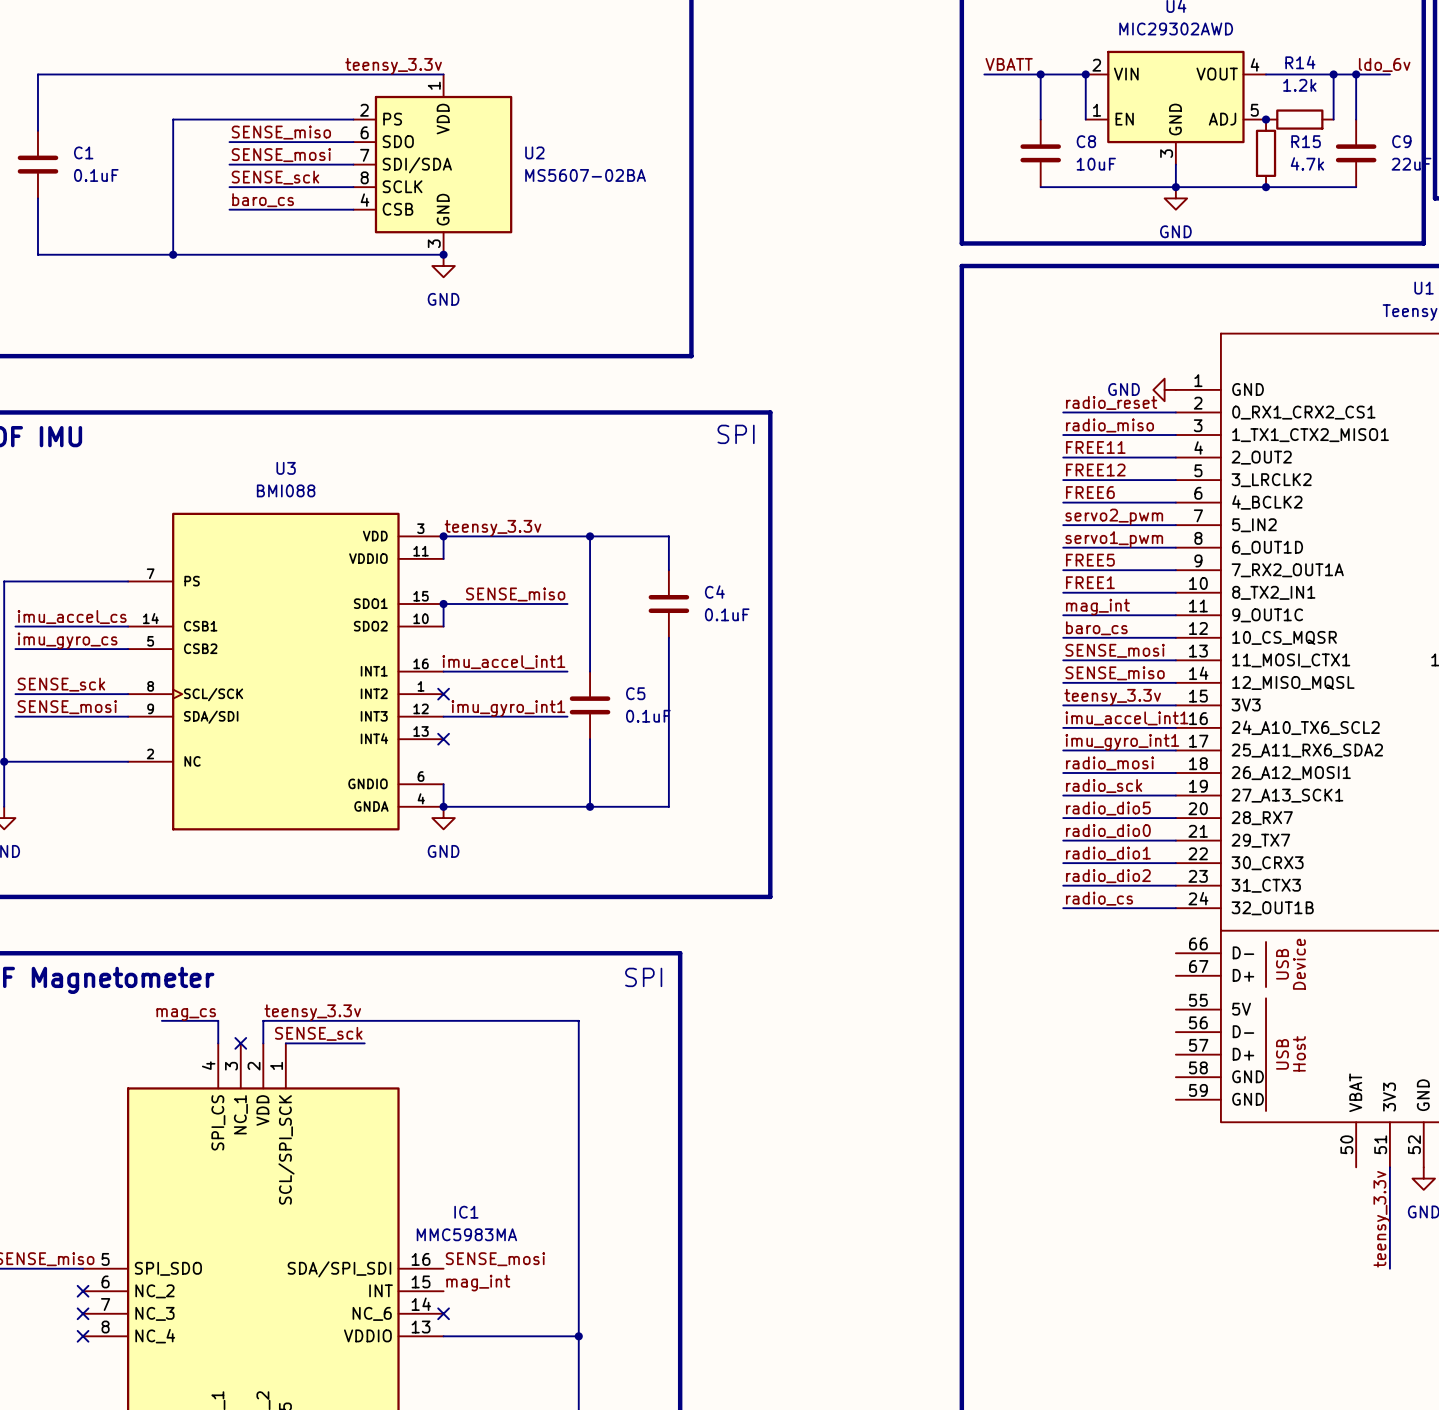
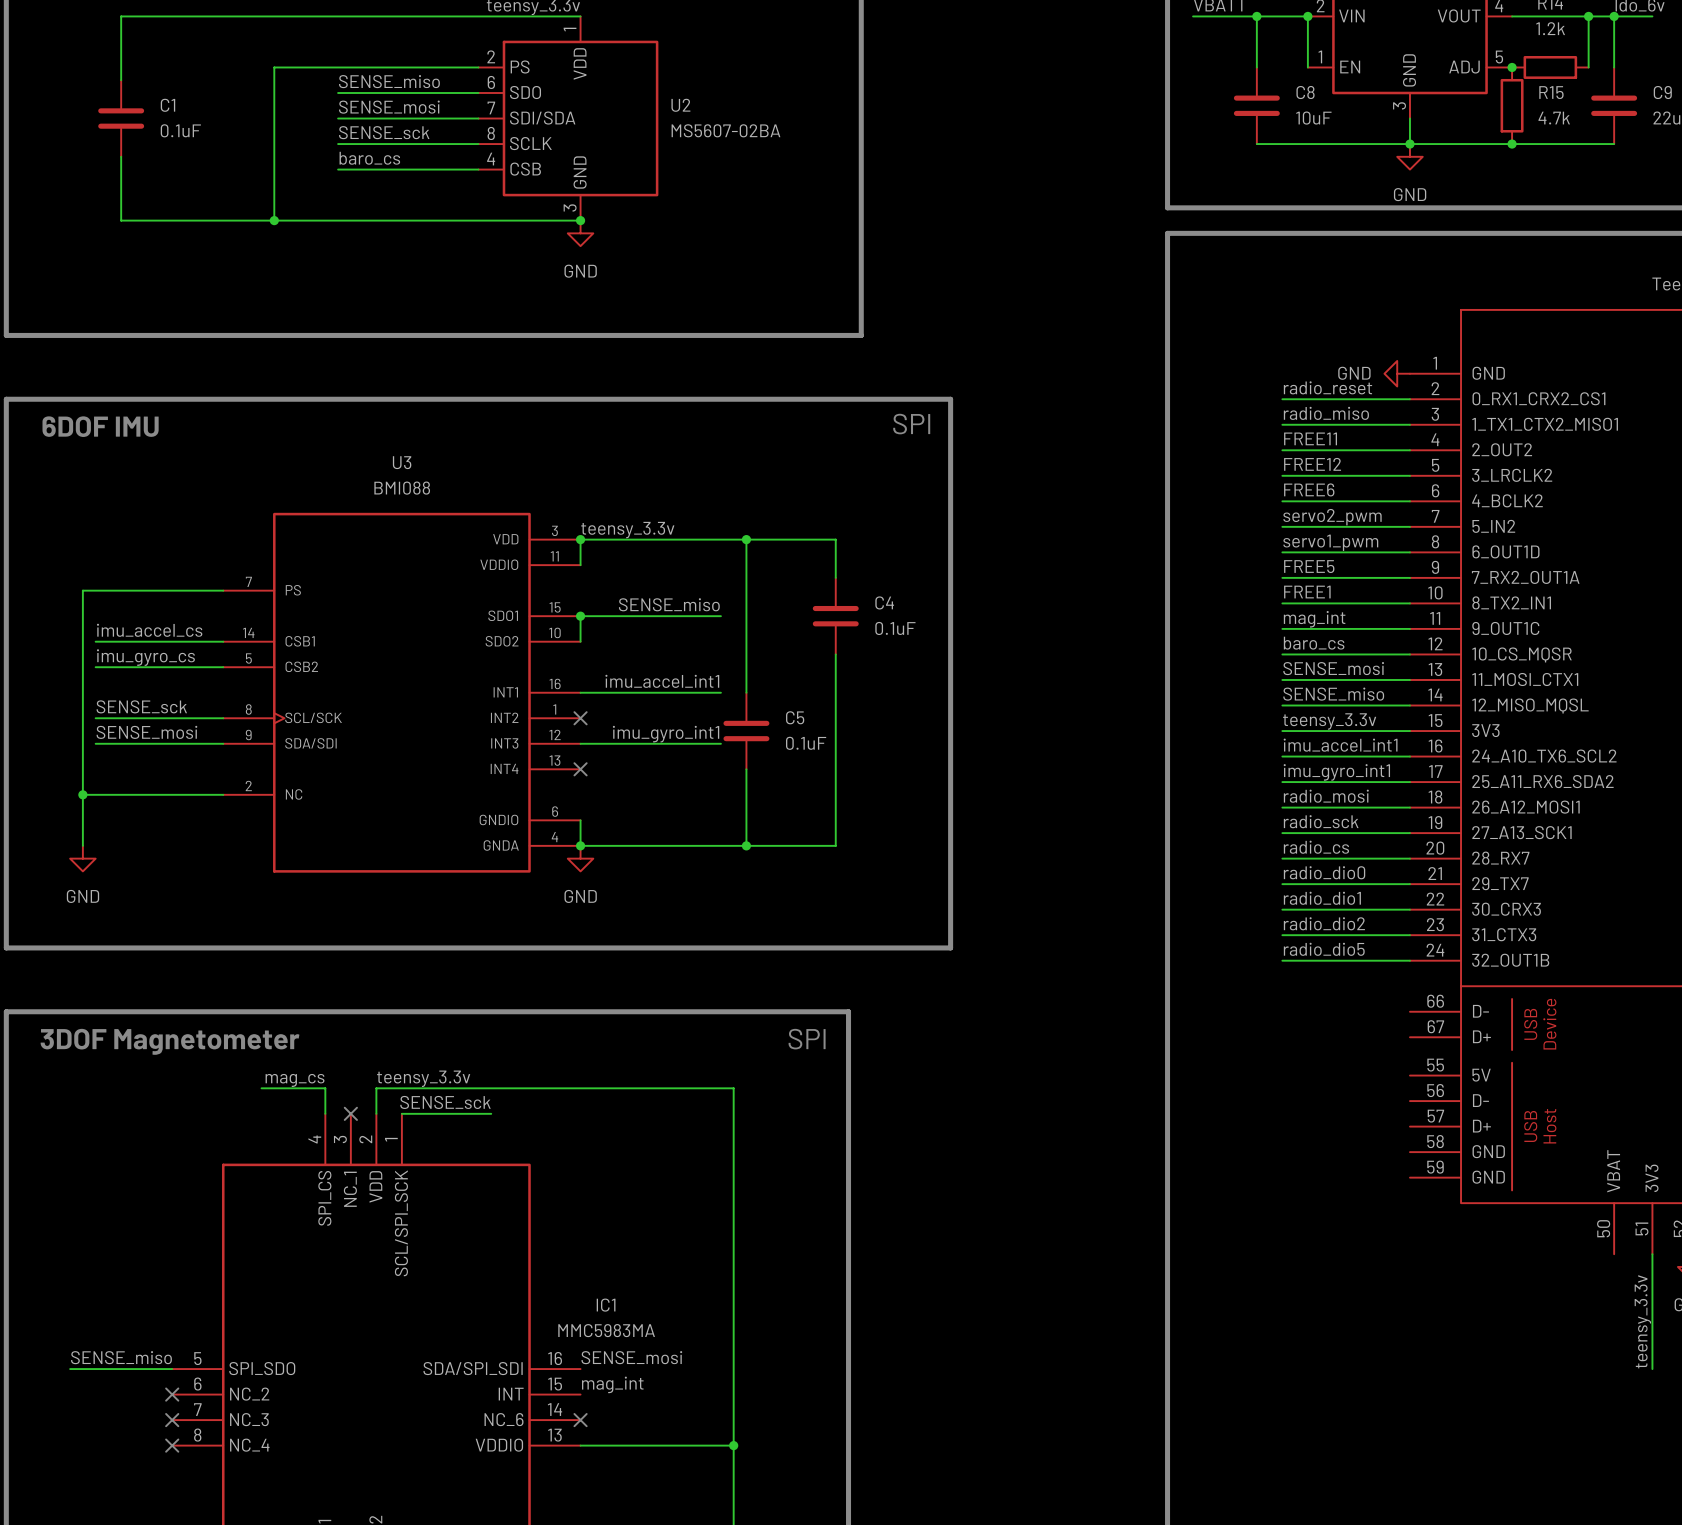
label: radio_dio5 (1108, 808) -> radio_cs (1316, 847)
label: radio_cs (1099, 898) -> radio_dio5 (1324, 949)

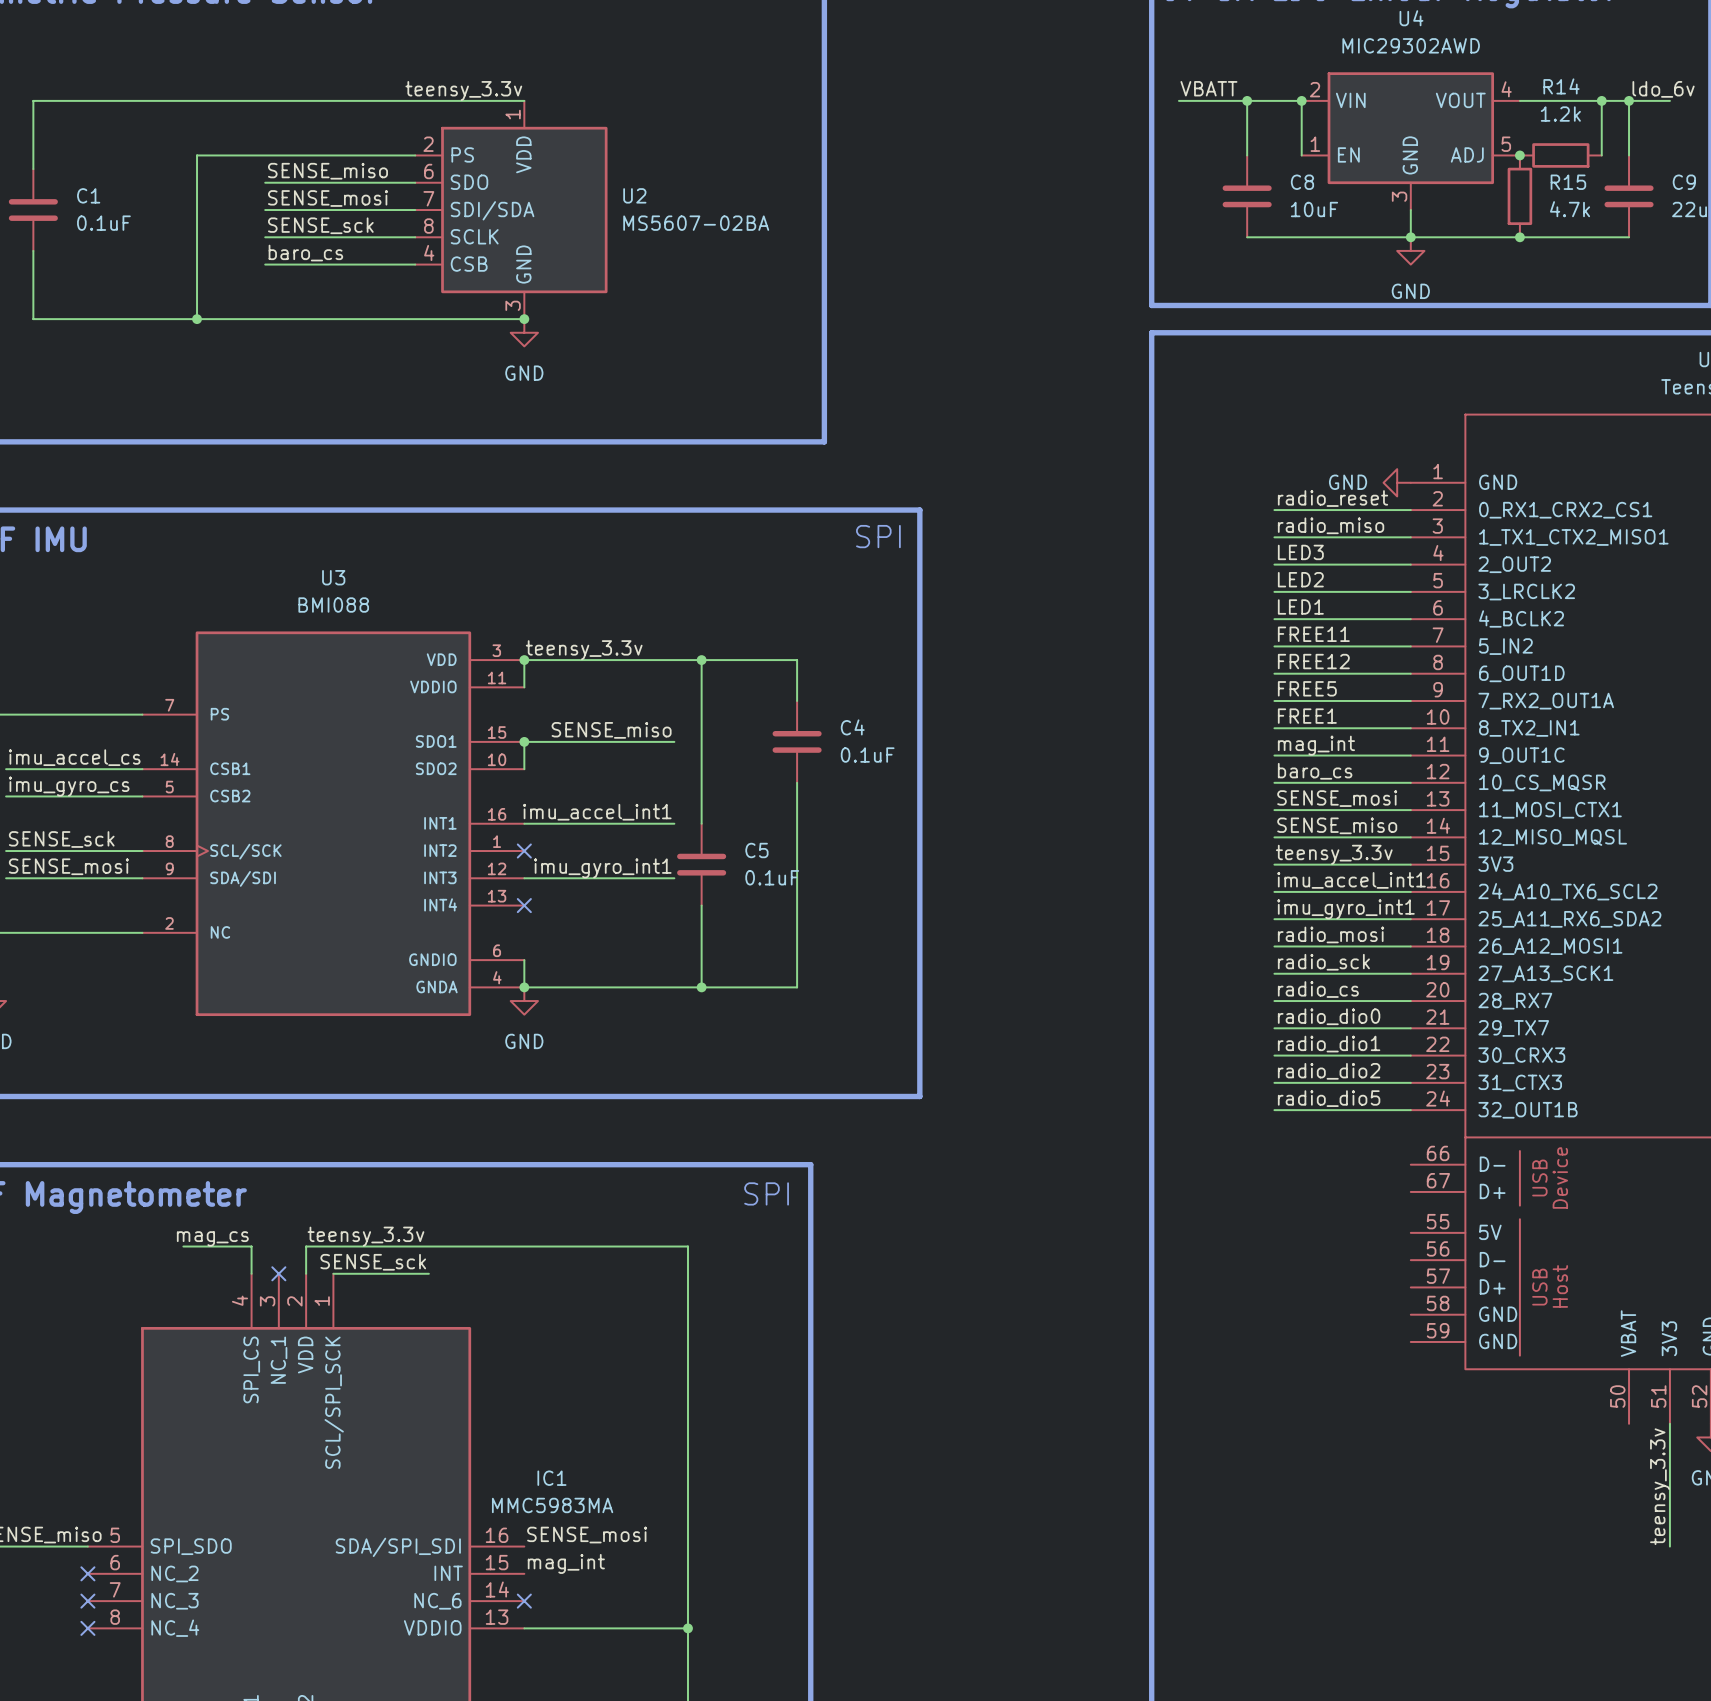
label: FREE11 (1310, 438) -> LED3 (1300, 552)
label: FREE12 (1312, 464) -> LED2 (1300, 579)
label: FREE6 (1309, 489) -> LED1 (1300, 606)
label: servo2_pwm (1332, 517) -> FREE11 (1313, 634)
label: servo1_pwm (1330, 542) -> FREE12 (1313, 661)

